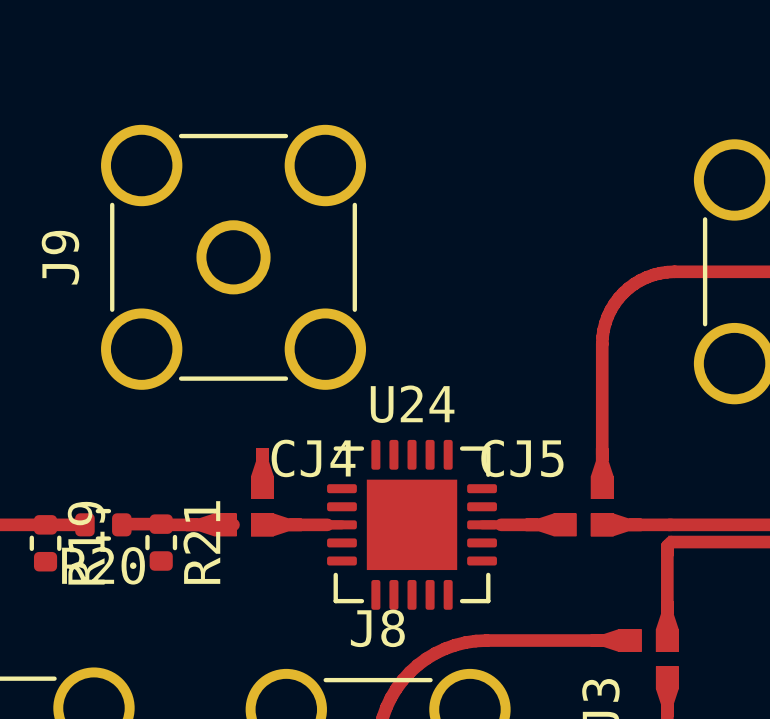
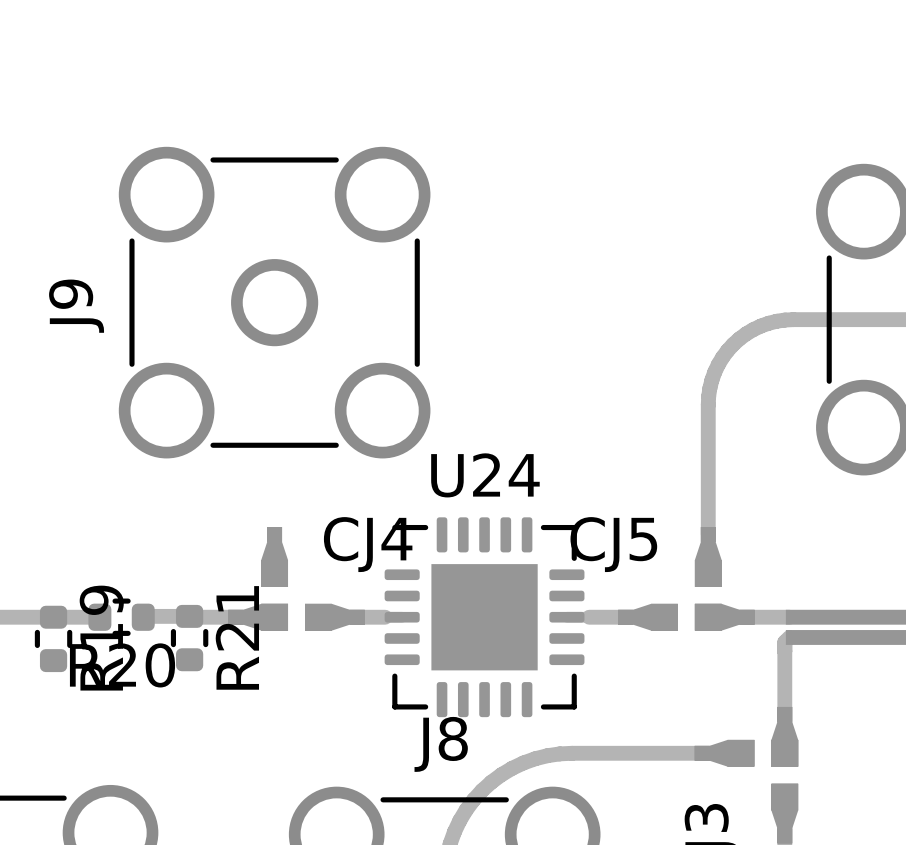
CJ4 footprint: [185, 448, 302, 537] -> [228, 527, 365, 631]

